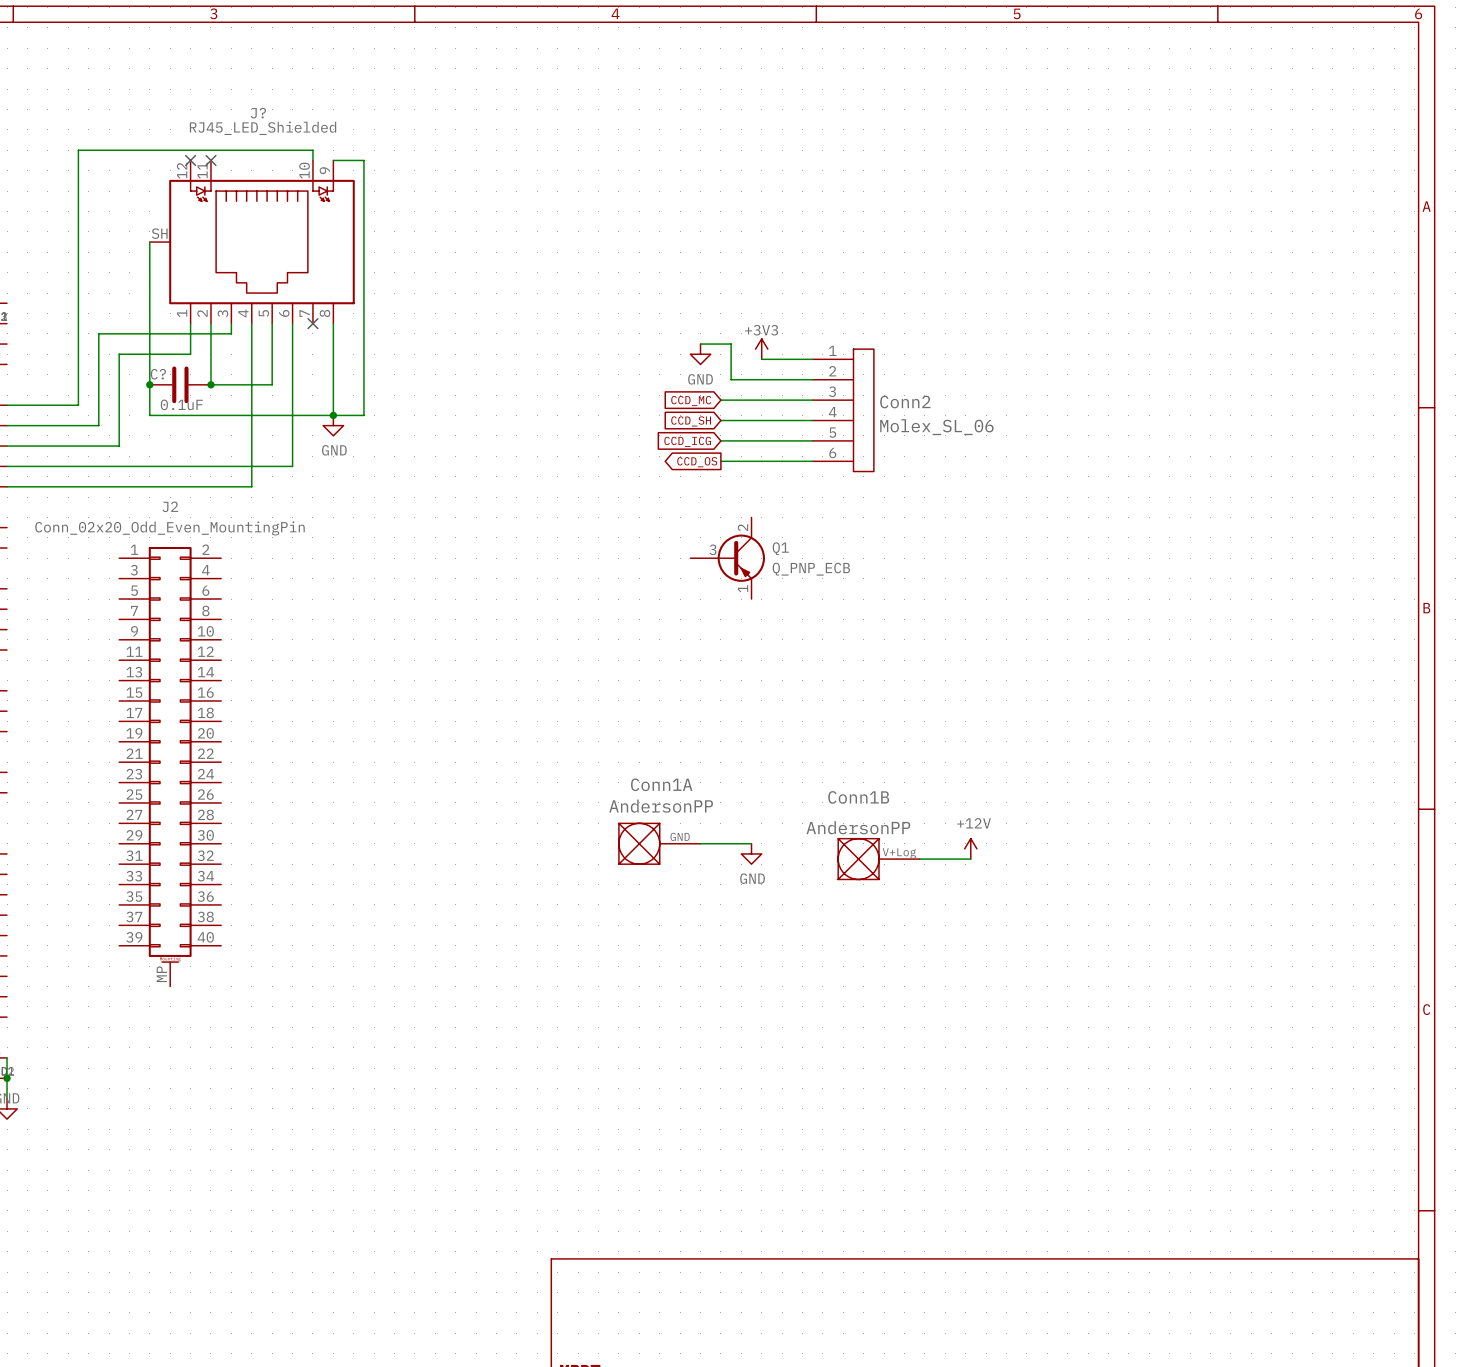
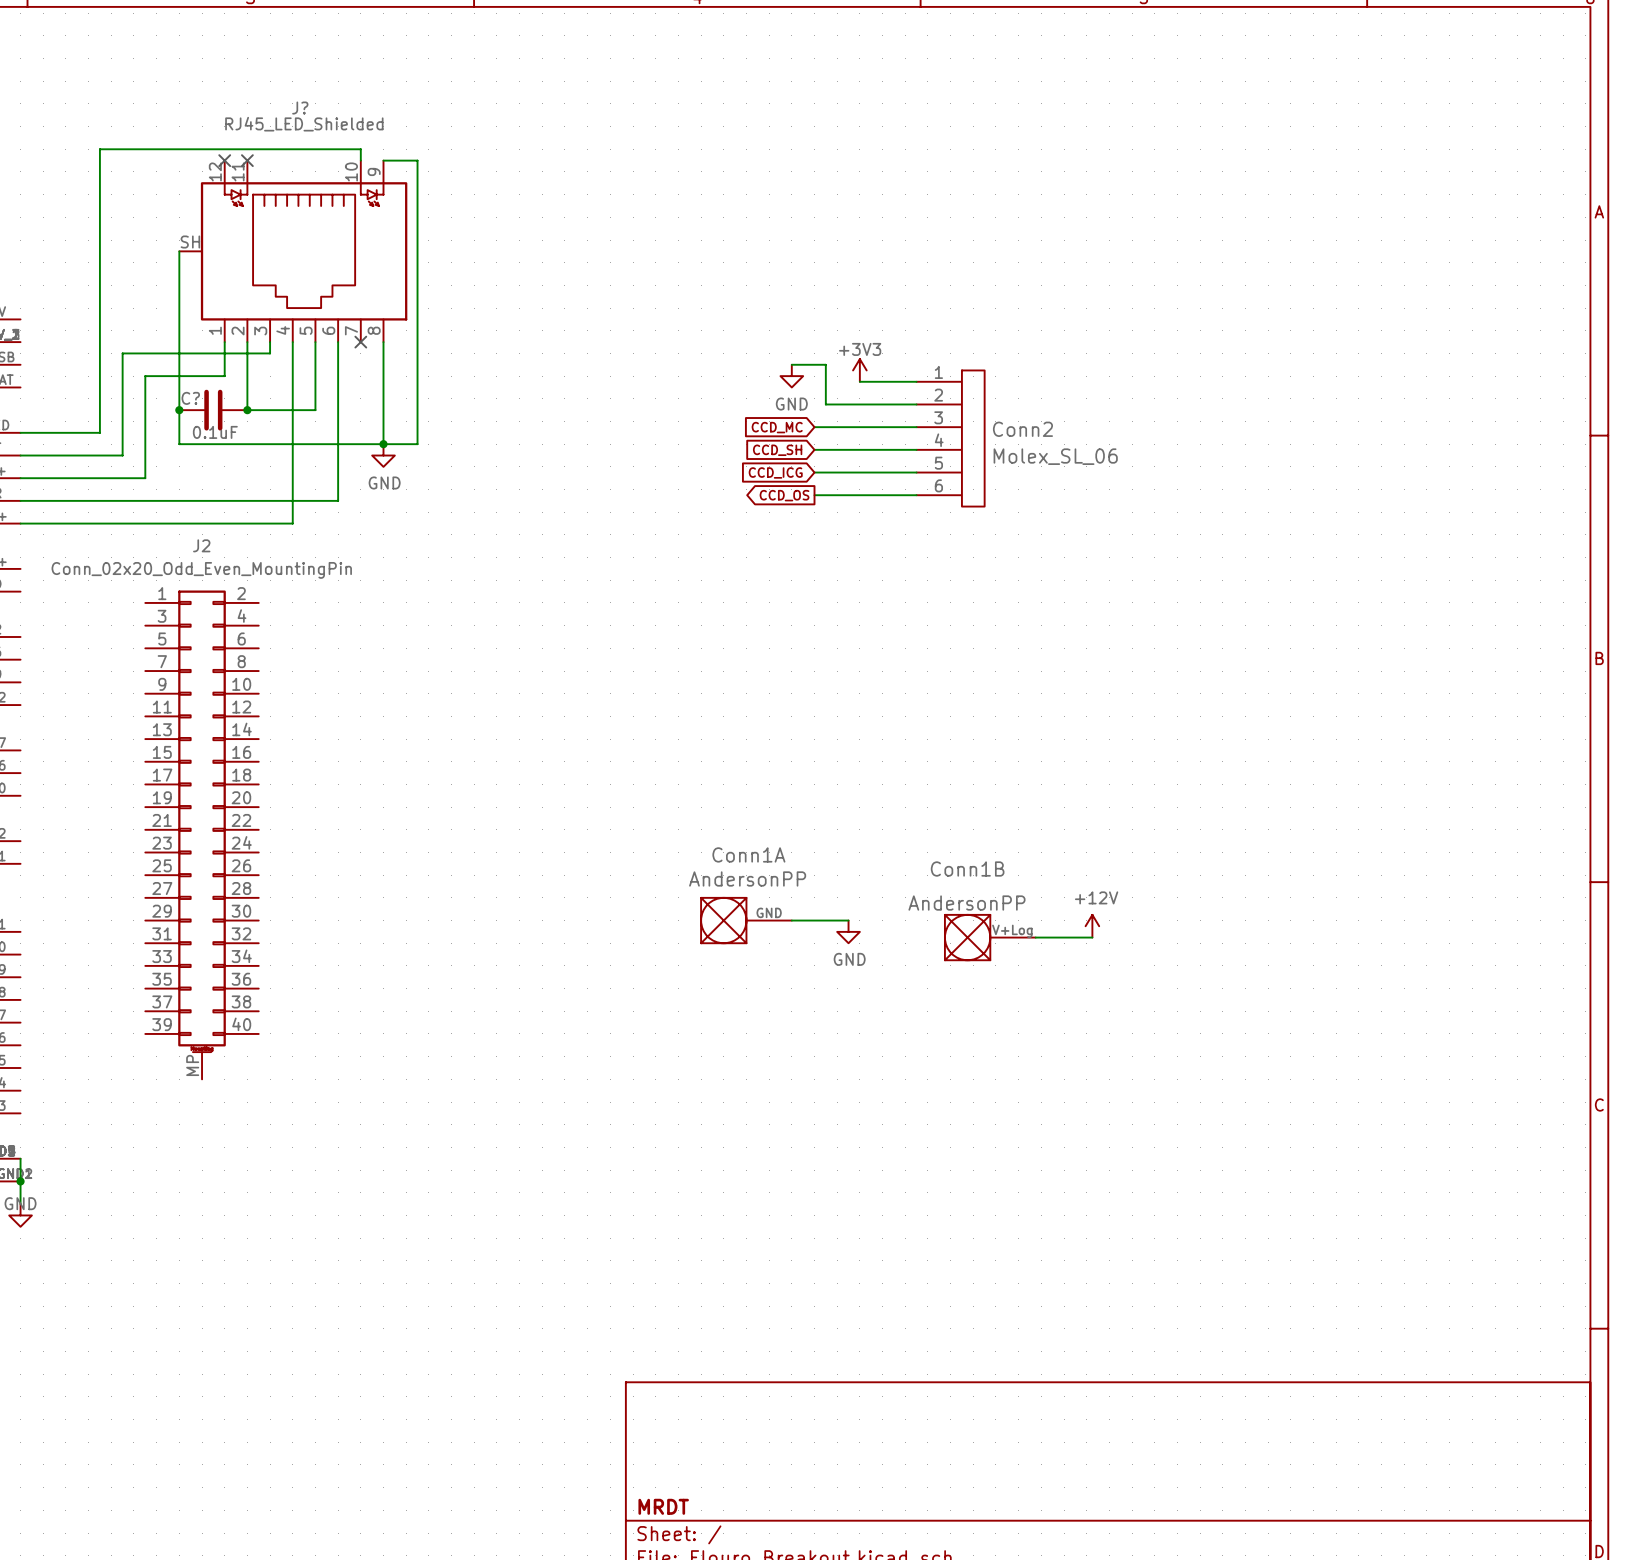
Q1: Q_PNP_ECB (727, 558) -> none

